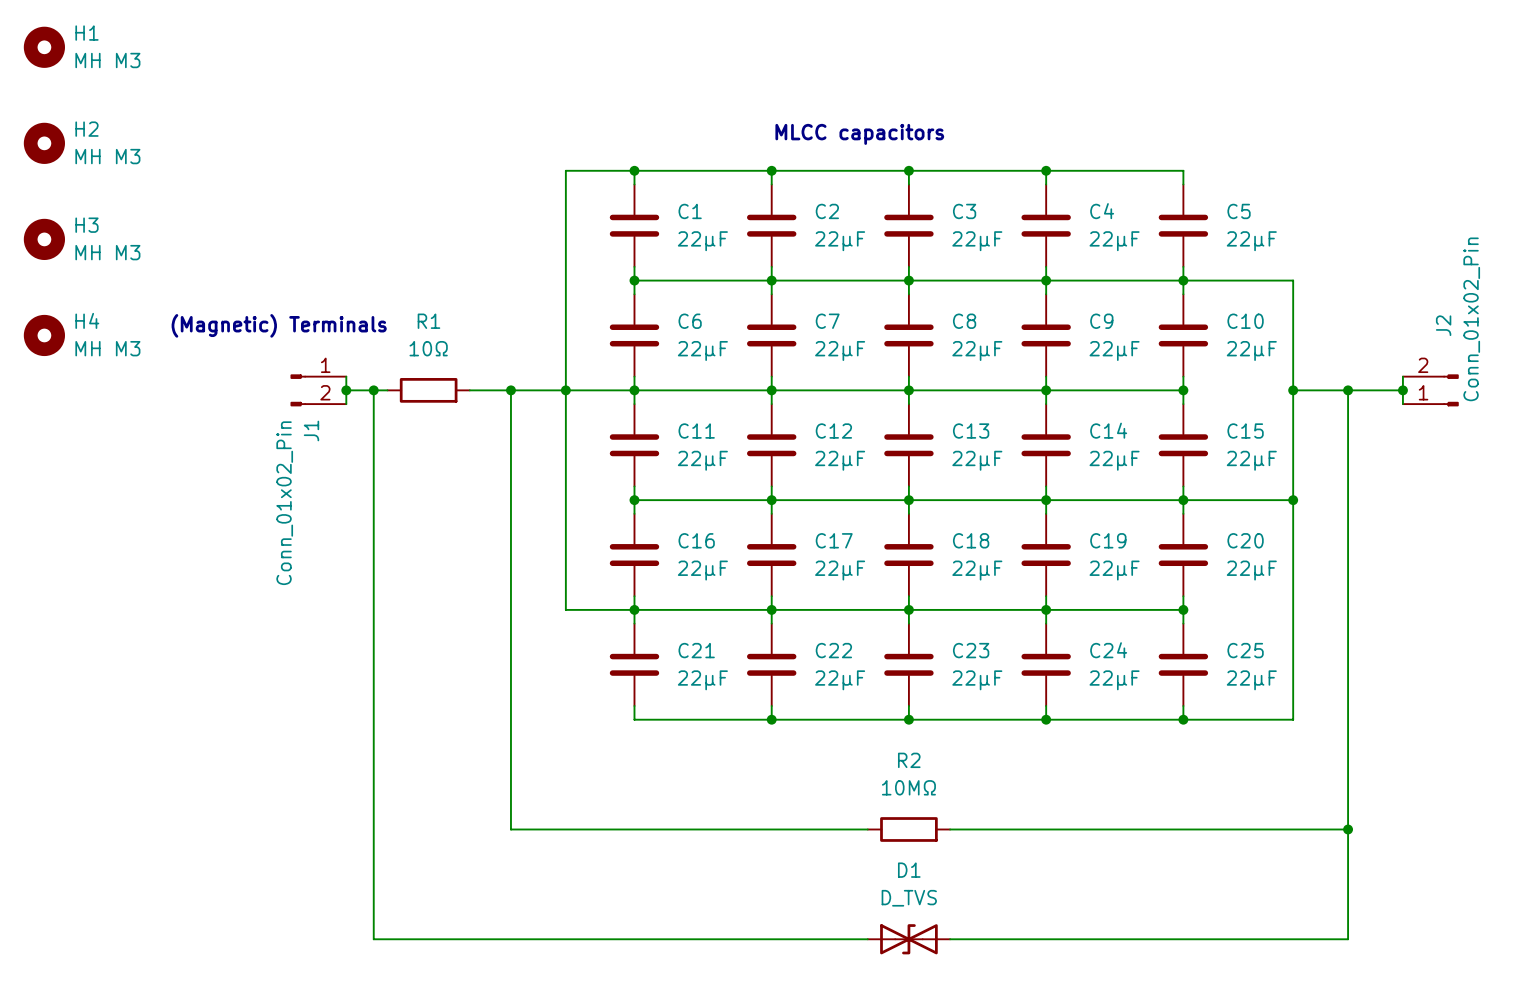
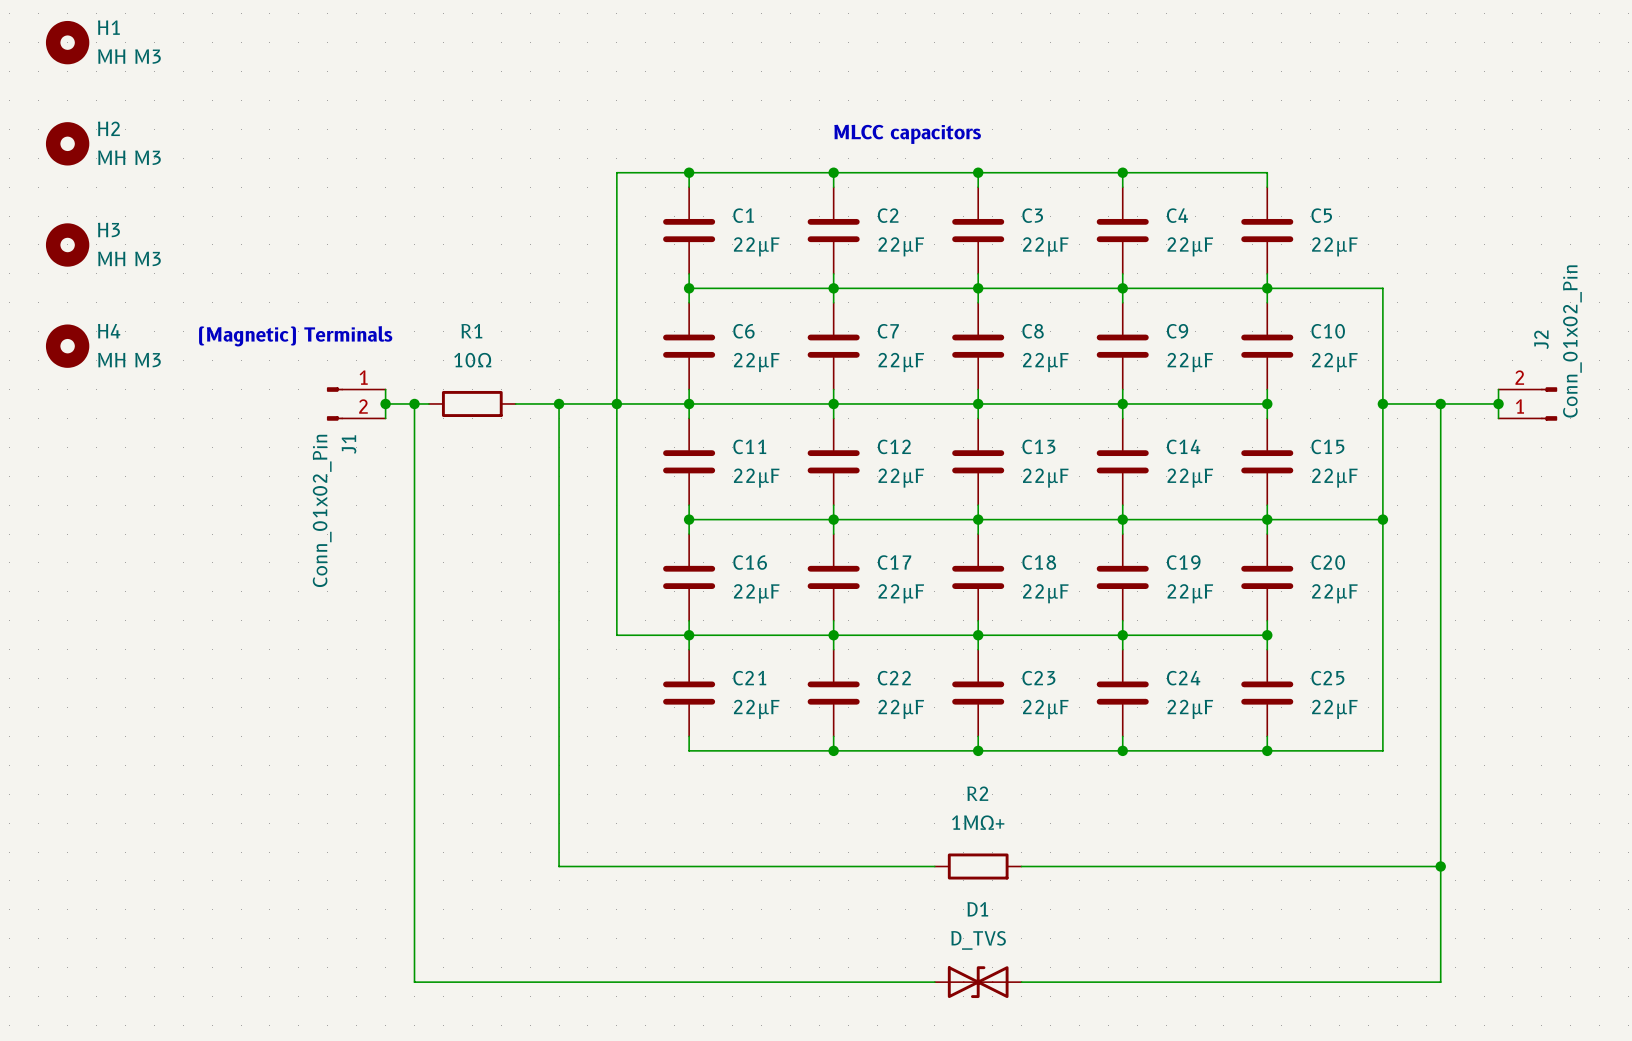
R2 value: 10MΩ (908, 787) -> 1MΩ+ (978, 822)

